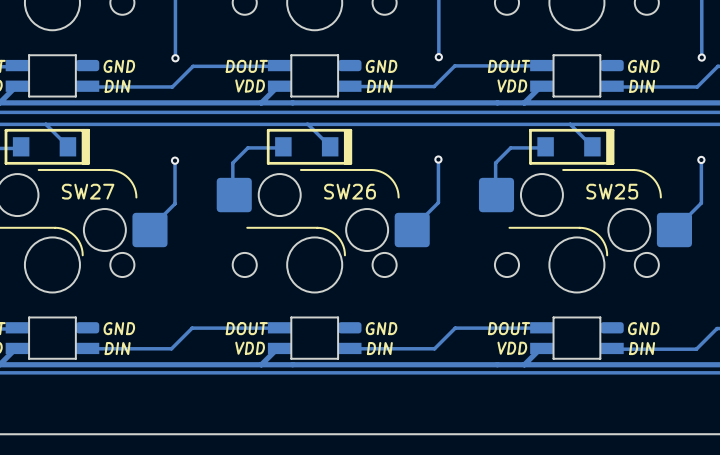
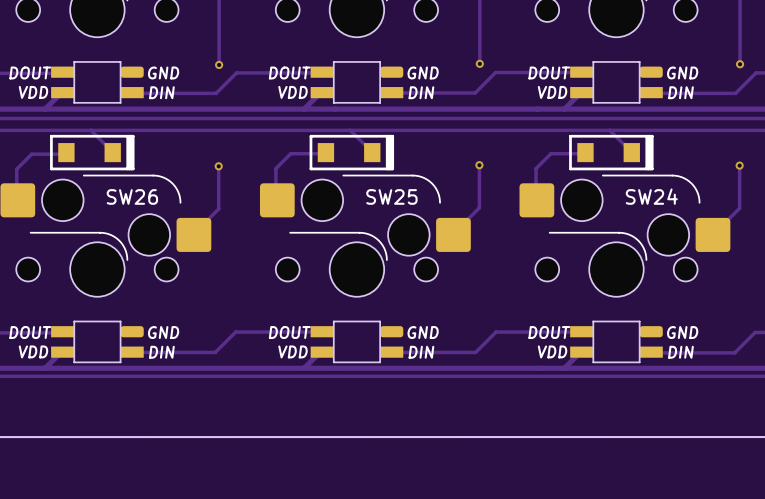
SW27 name: SW27 (88, 191) -> SW26 (132, 196)
SW26 name: SW26 (350, 191) -> SW25 (391, 196)
SW25 name: SW25 (612, 191) -> SW24 (651, 196)

